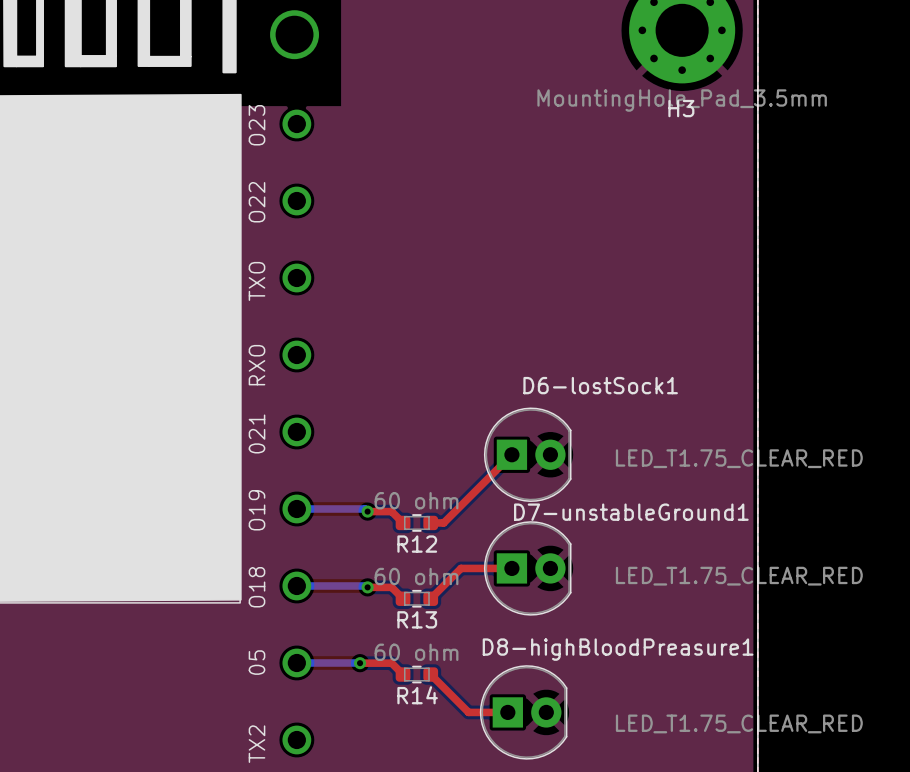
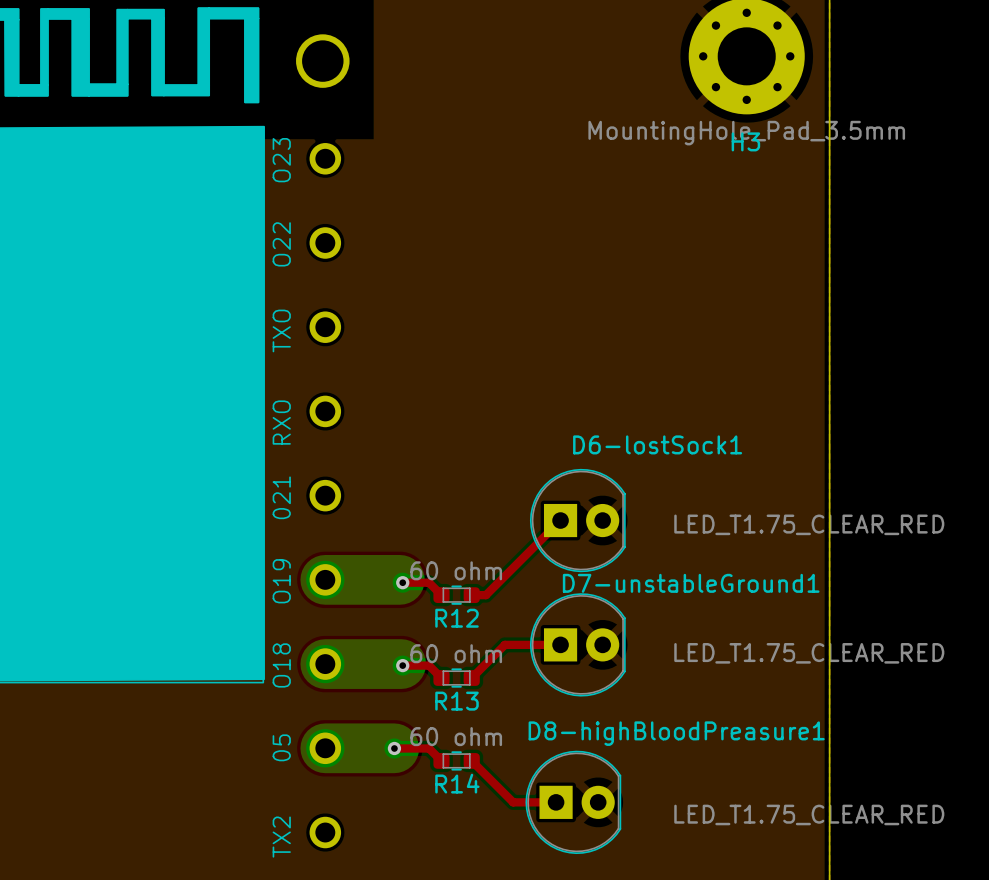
bottom track width: thin (296, 508) (365, 508) -> thick (325, 579) (399, 579)
bottom track width: thin (296, 585) (366, 585) -> thick (325, 664) (401, 664)
bottom track width: thin (296, 662) (359, 662) -> thick (325, 748) (394, 748)

